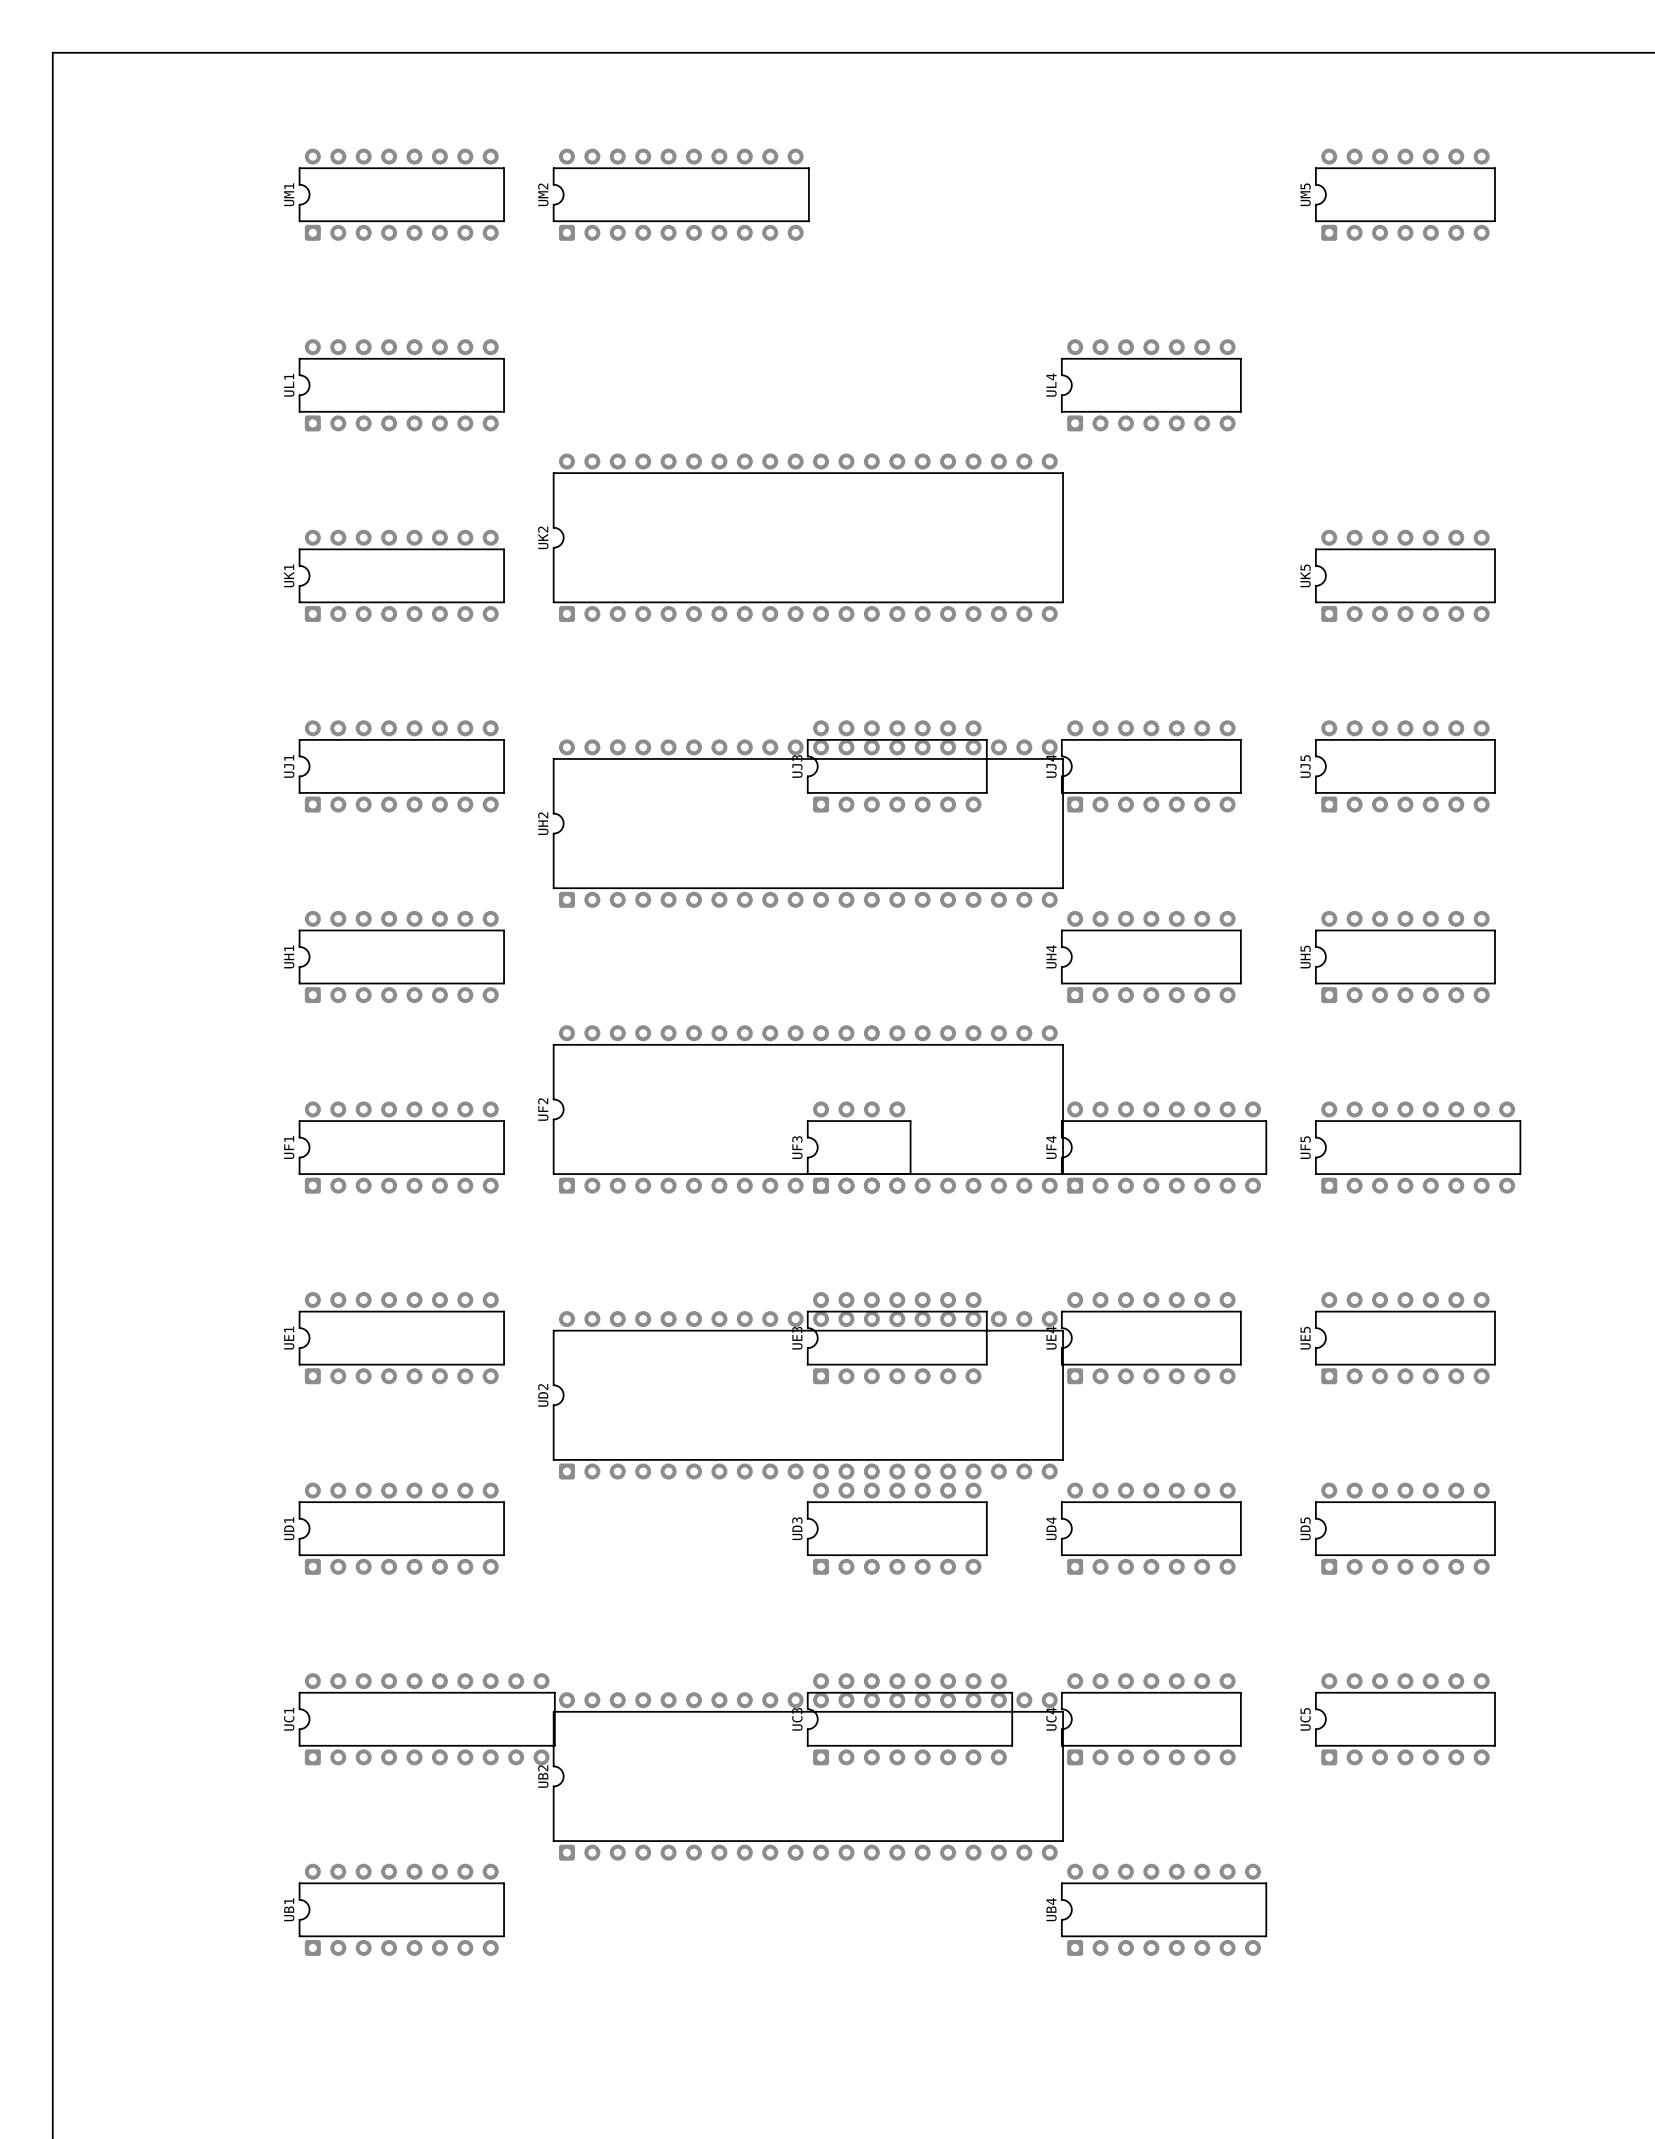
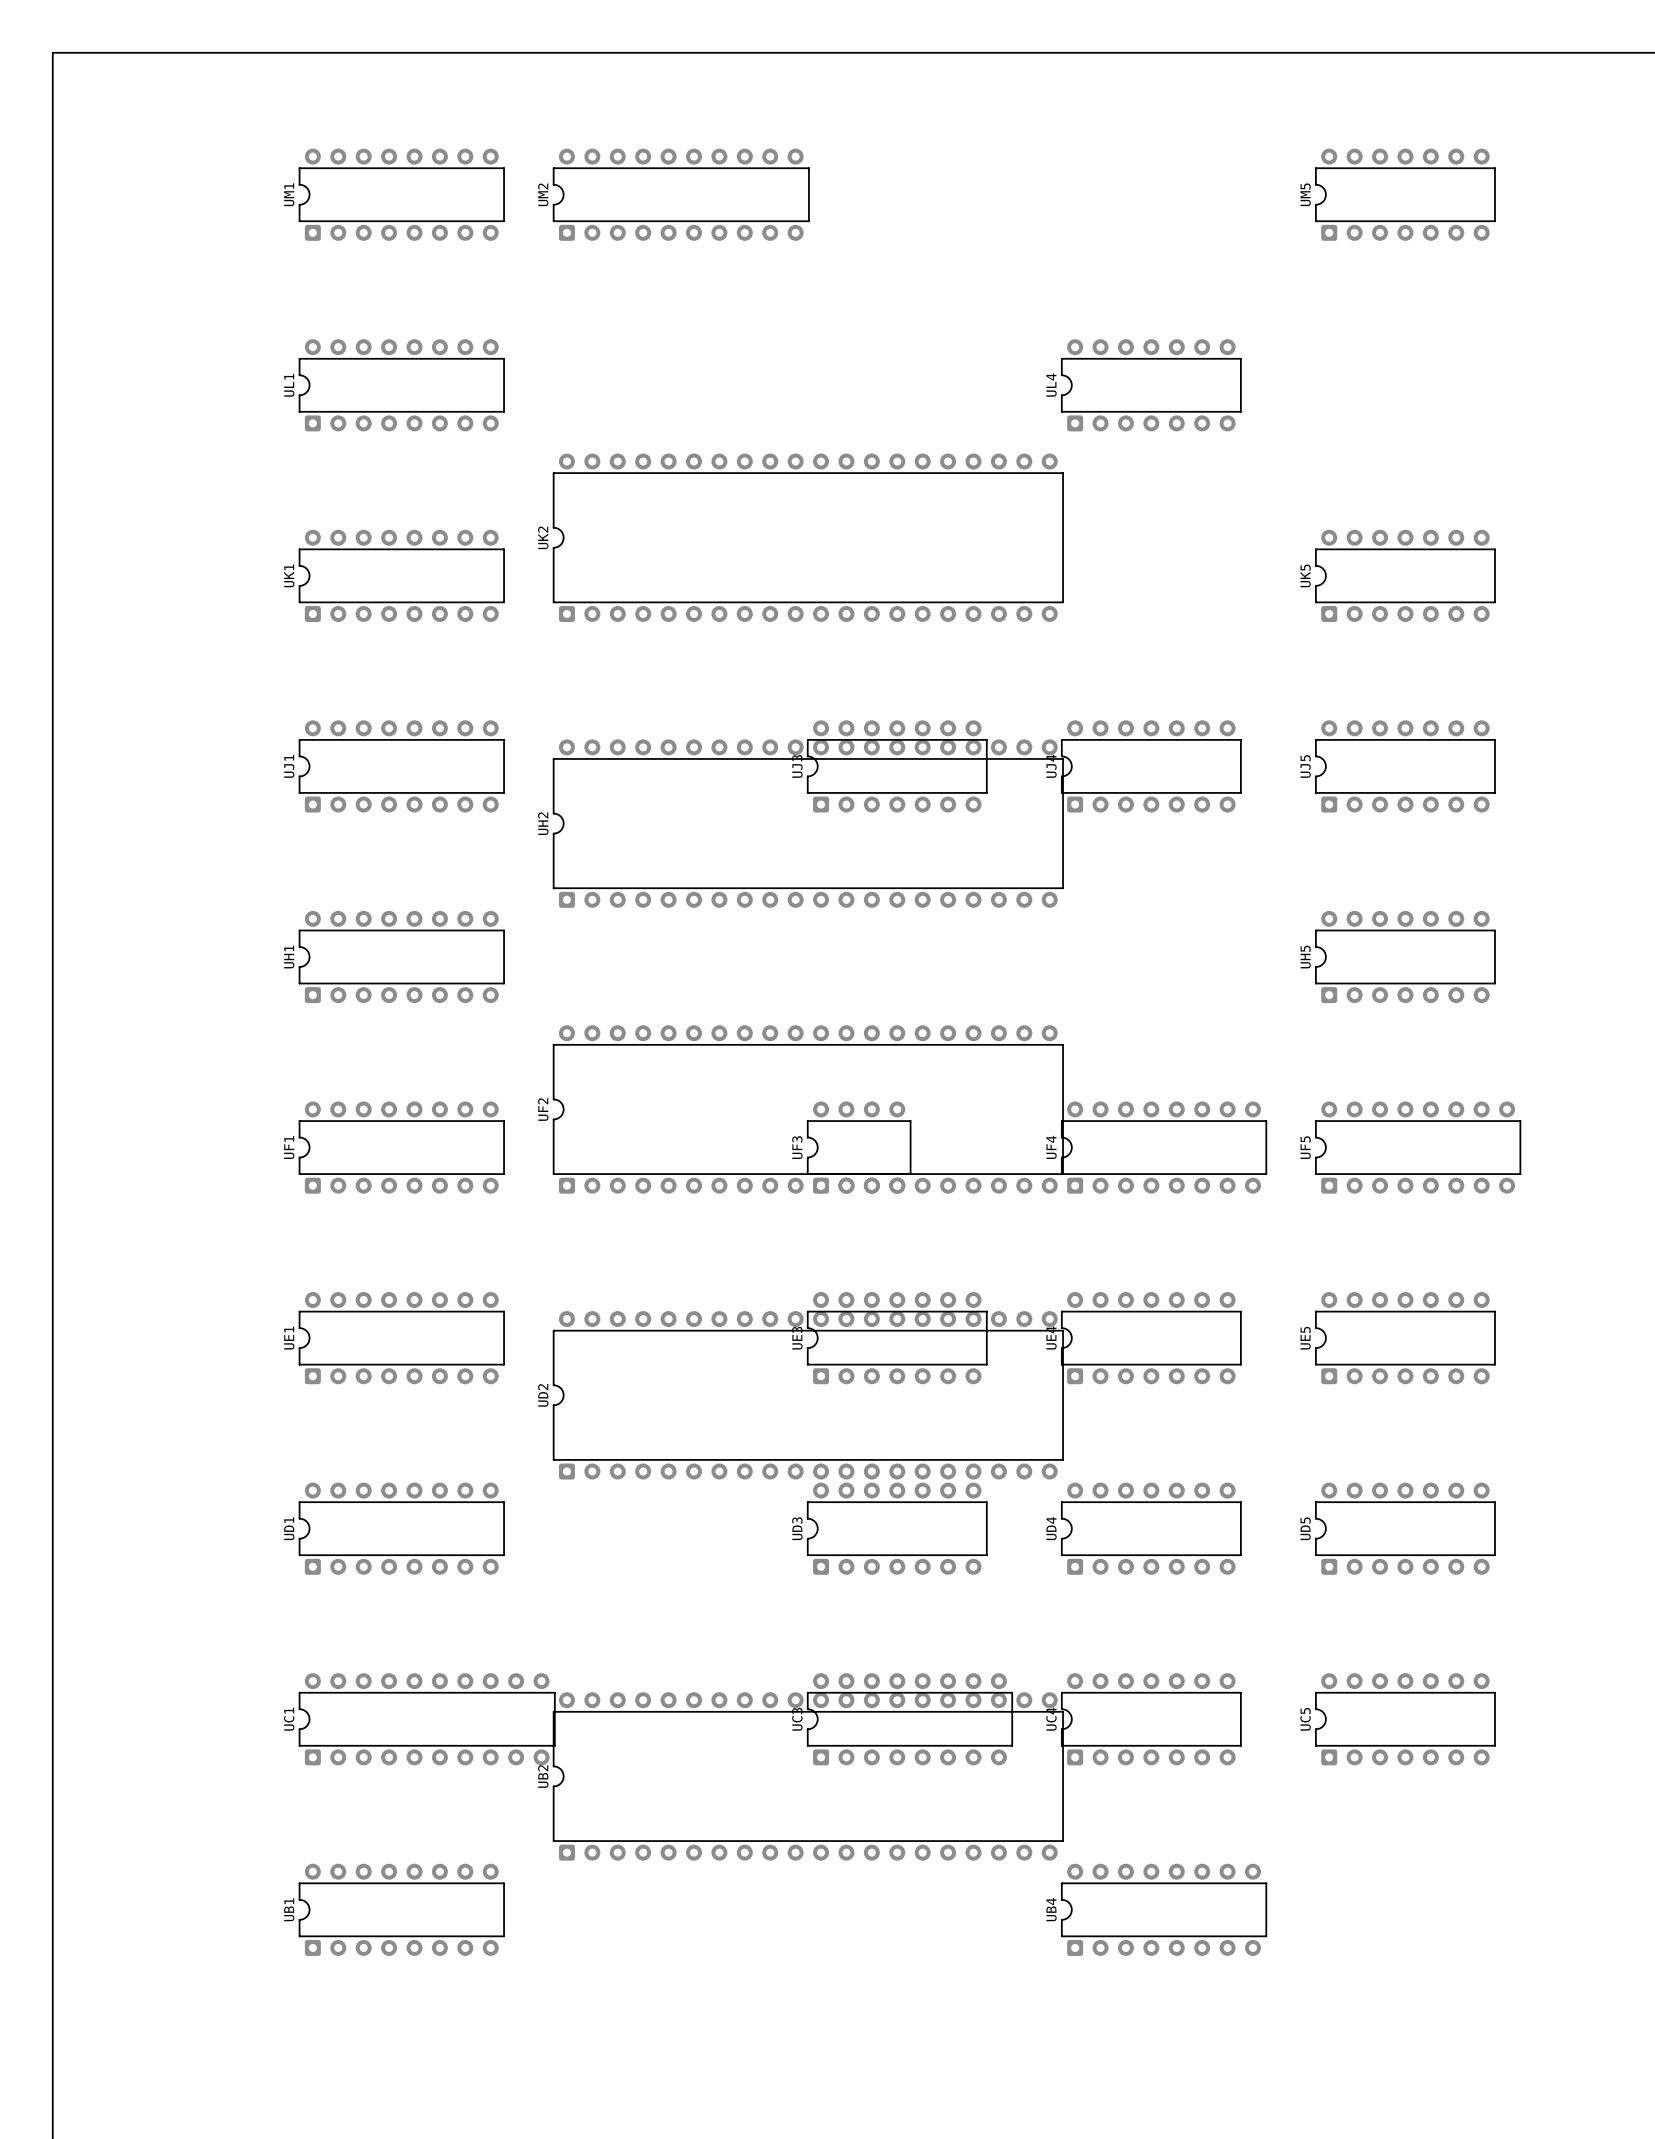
UH4: (1151, 956) -> none

